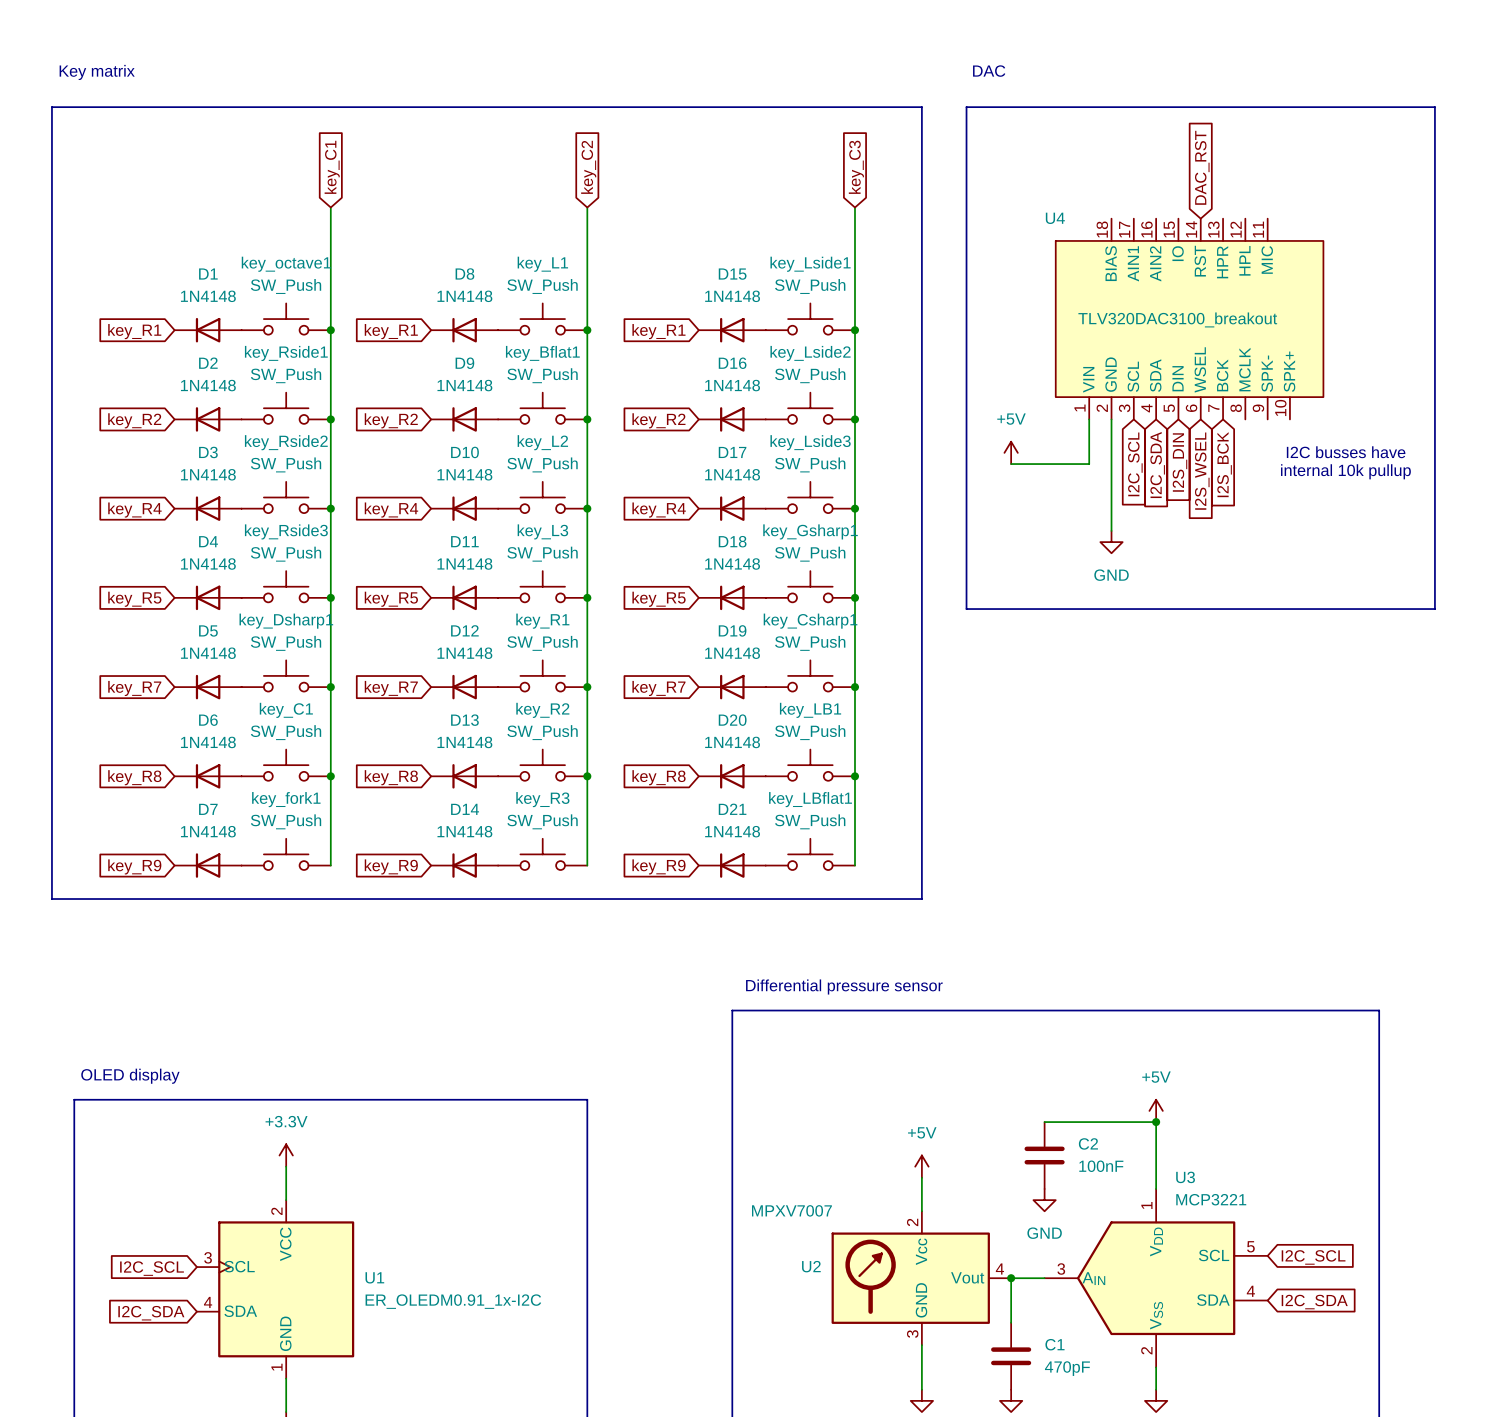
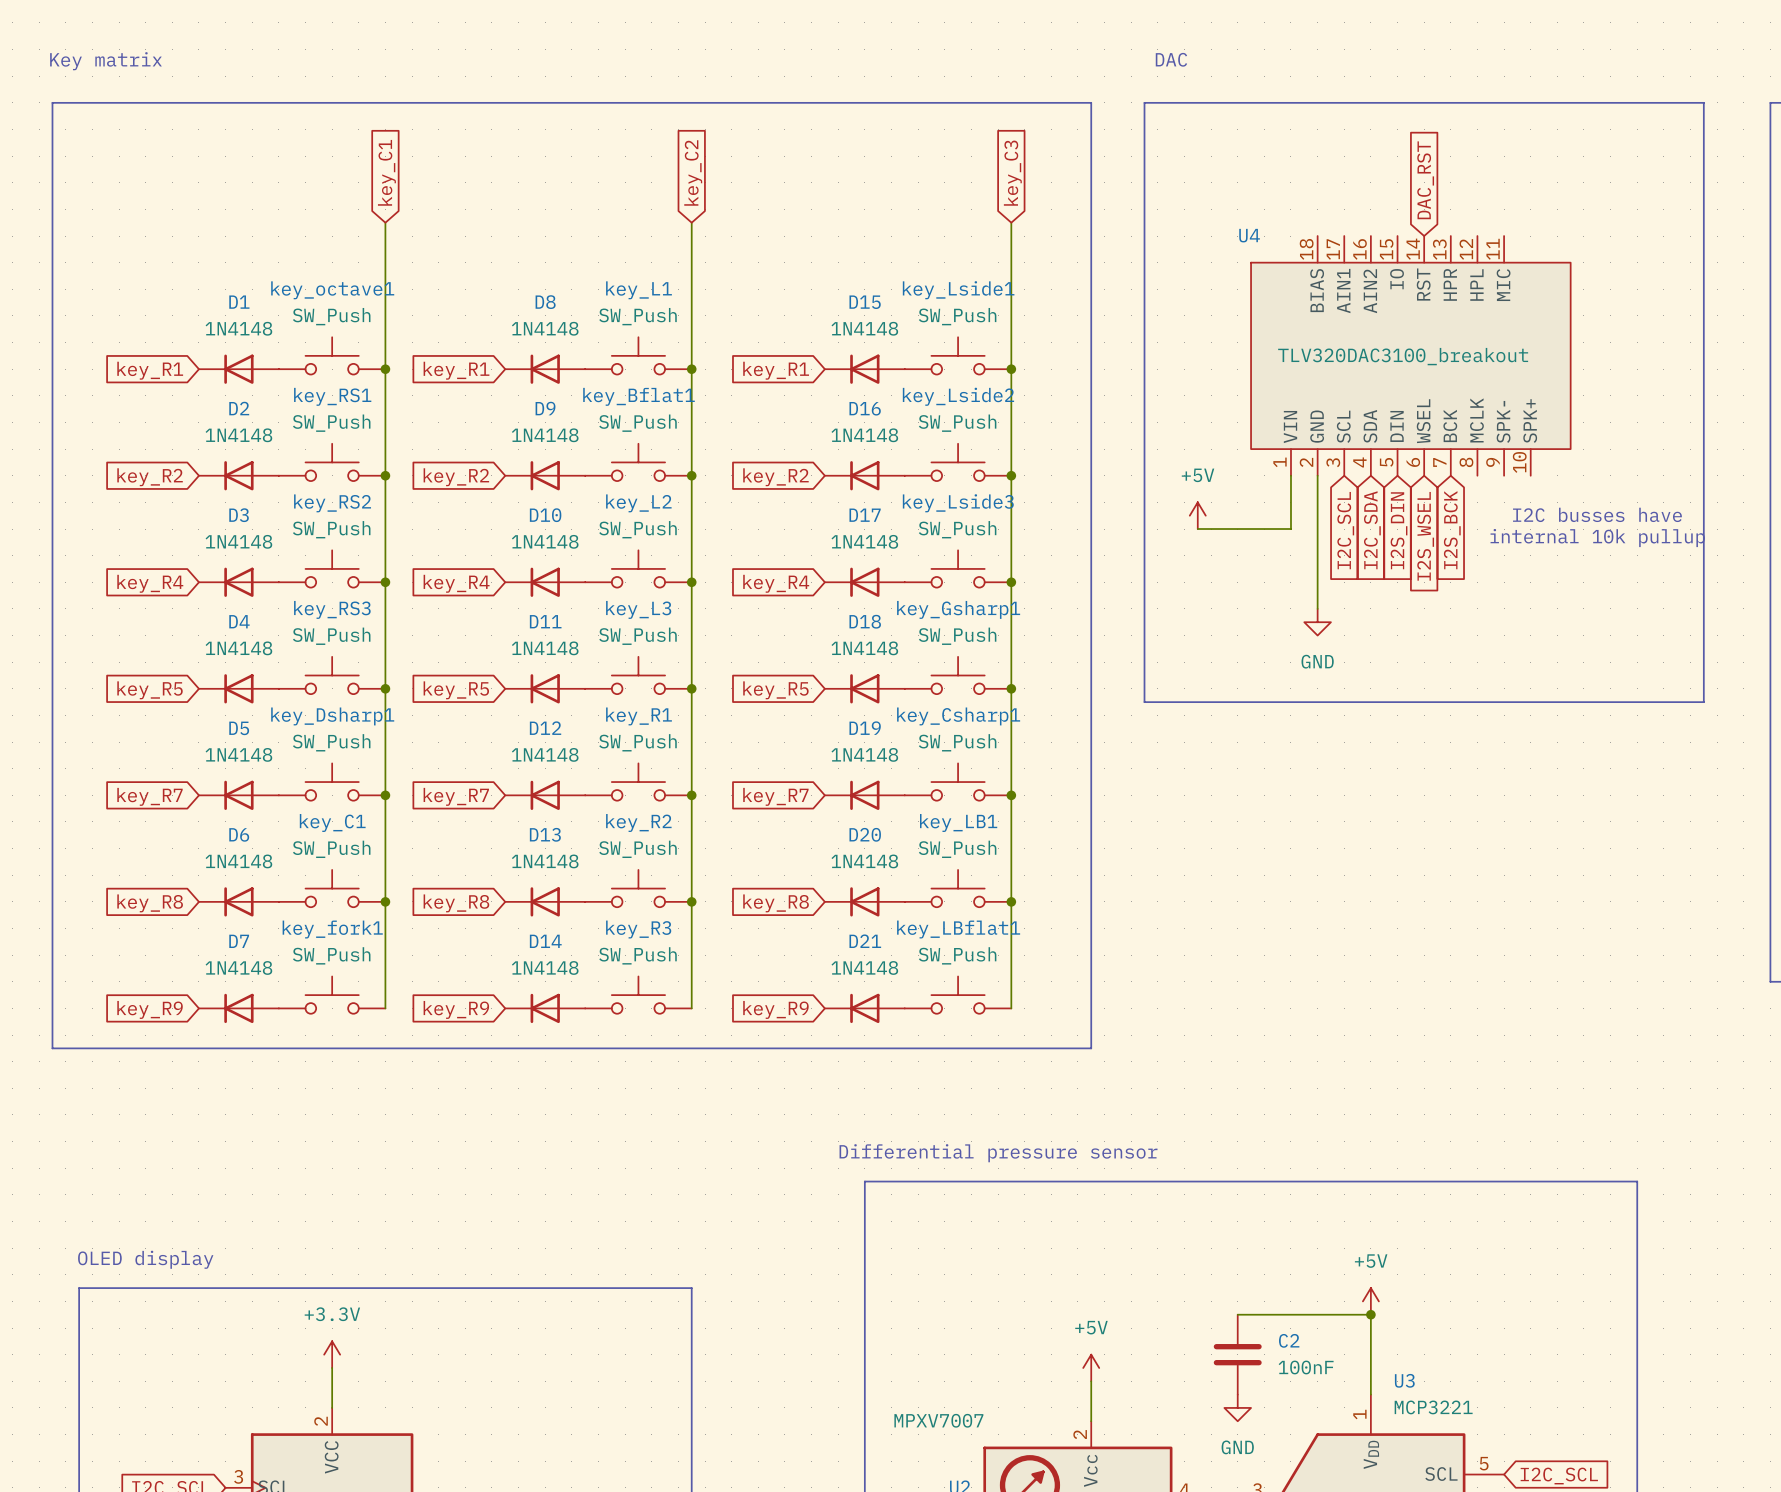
key_Rside1 name: key_Rside1 (286, 353) -> key_RS1 (332, 396)
key_Rside2 name: key_Rside2 (286, 442) -> key_RS2 (332, 503)
key_Rside3 name: key_Rside3 (286, 531) -> key_RS3 (332, 609)

